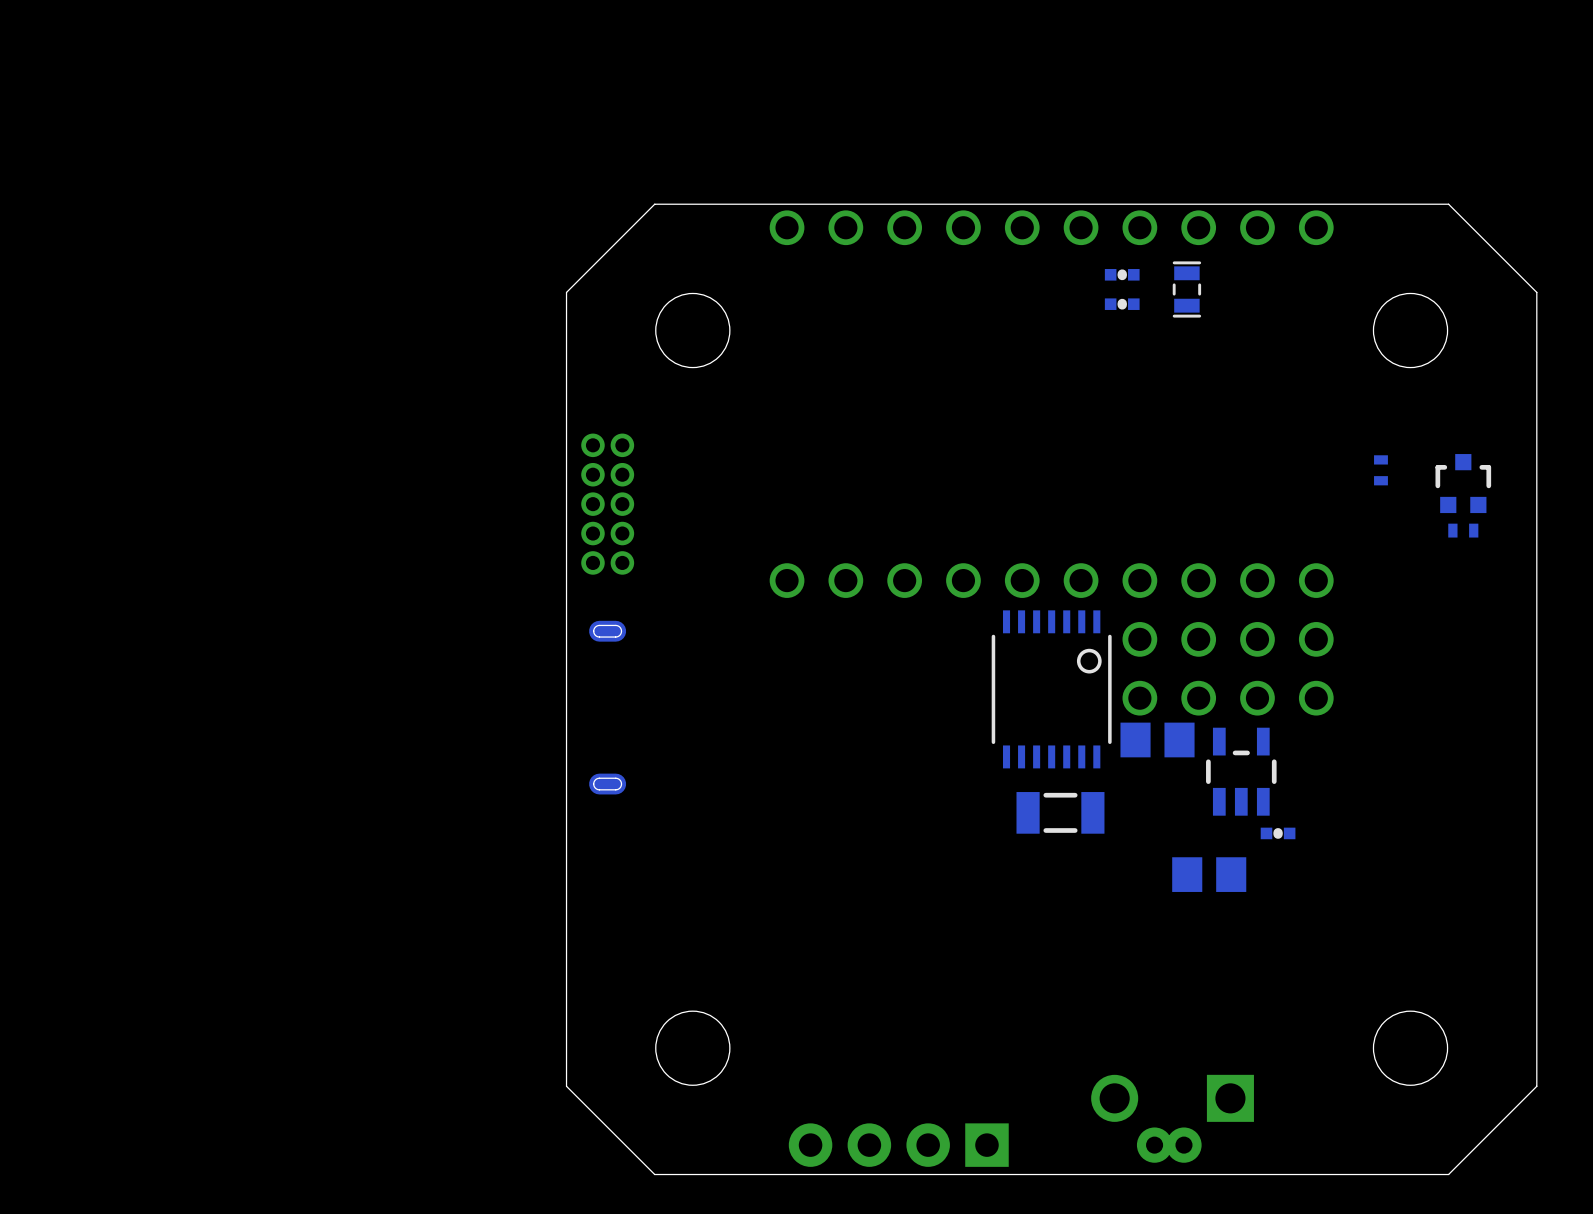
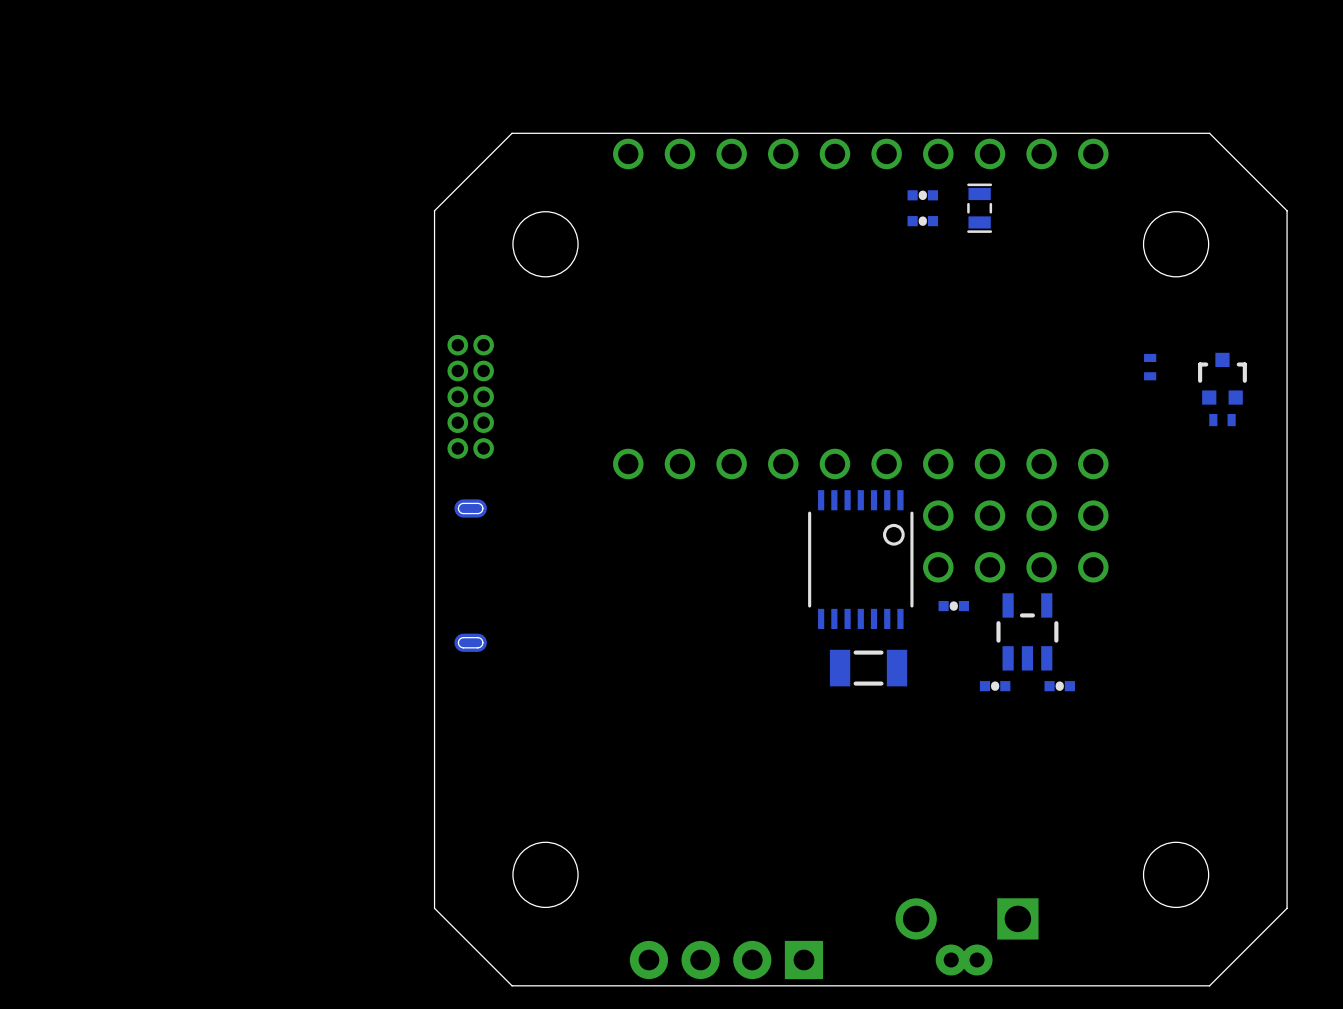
part footprint: [1120, 722, 1195, 758] -> [938, 600, 970, 612]
part: none -> (995, 686)
part: (1209, 874) -> none

